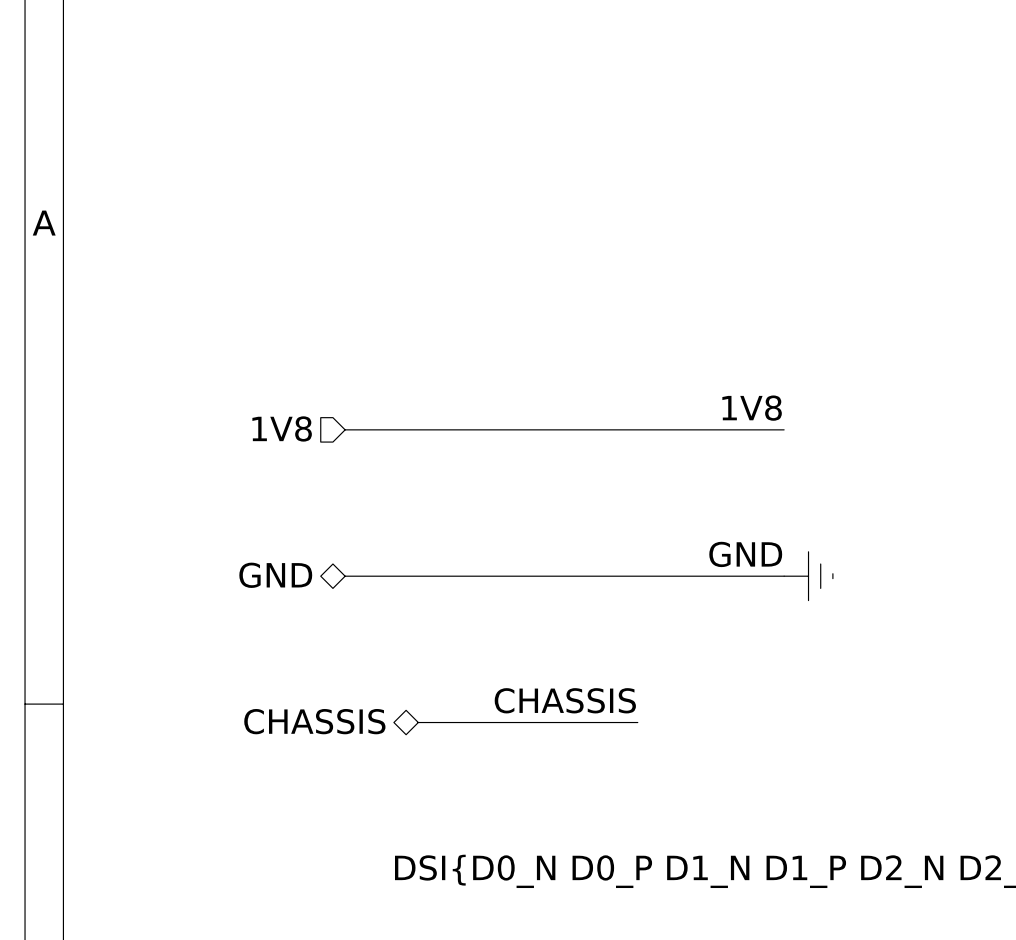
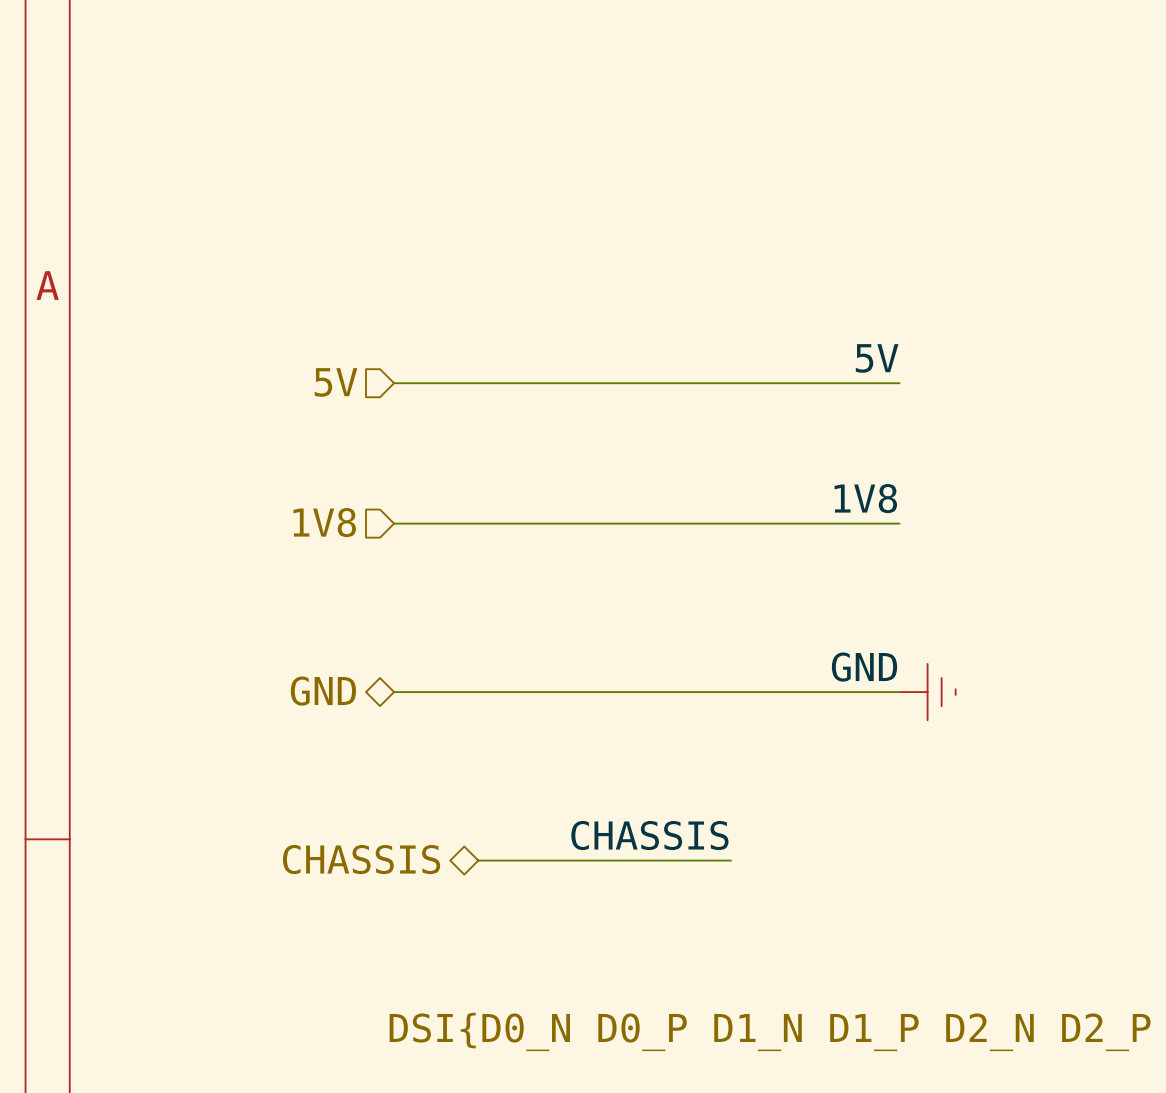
label: none -> 5V (877, 358)
hierarchical label: none -> 5V (336, 382)
wire: none -> (394, 383) (899, 383)

